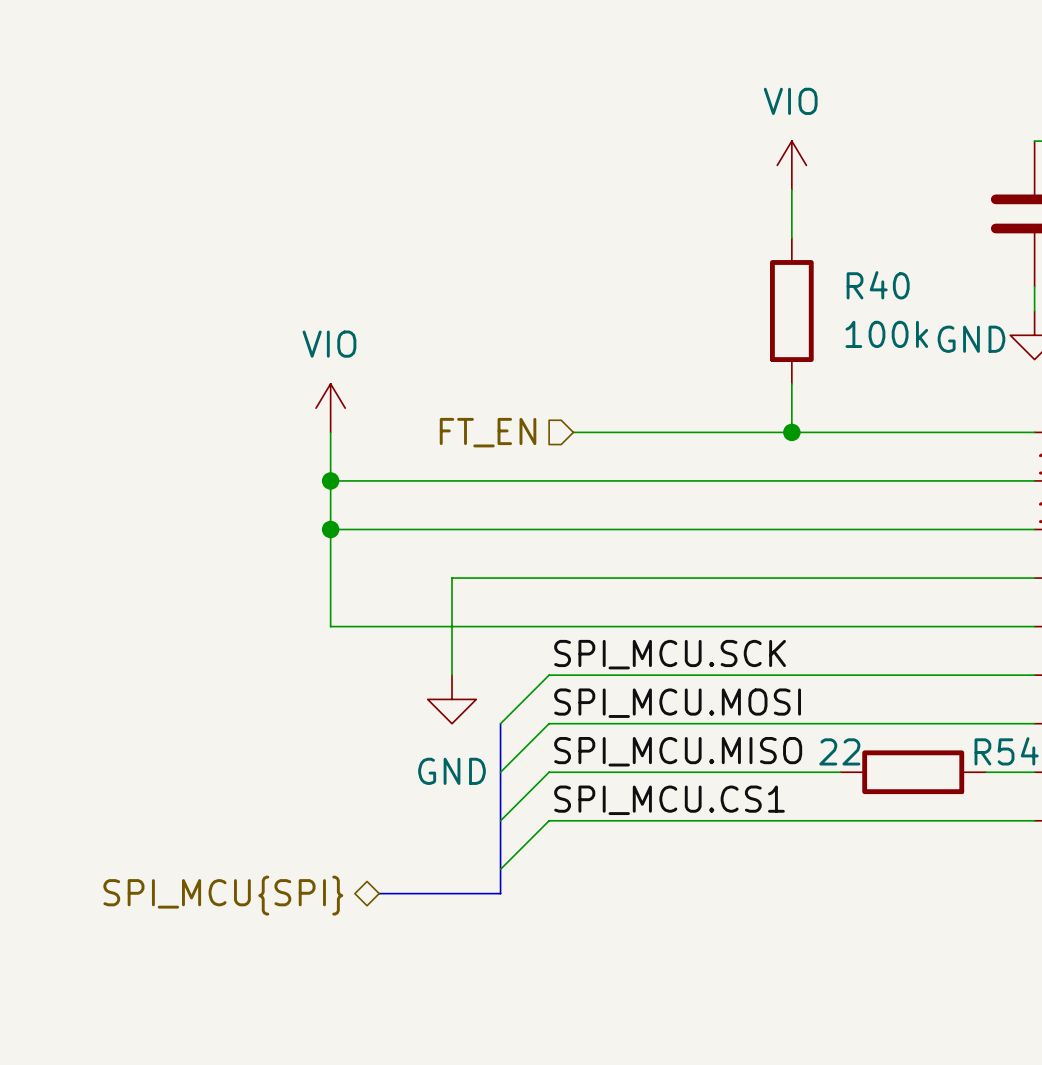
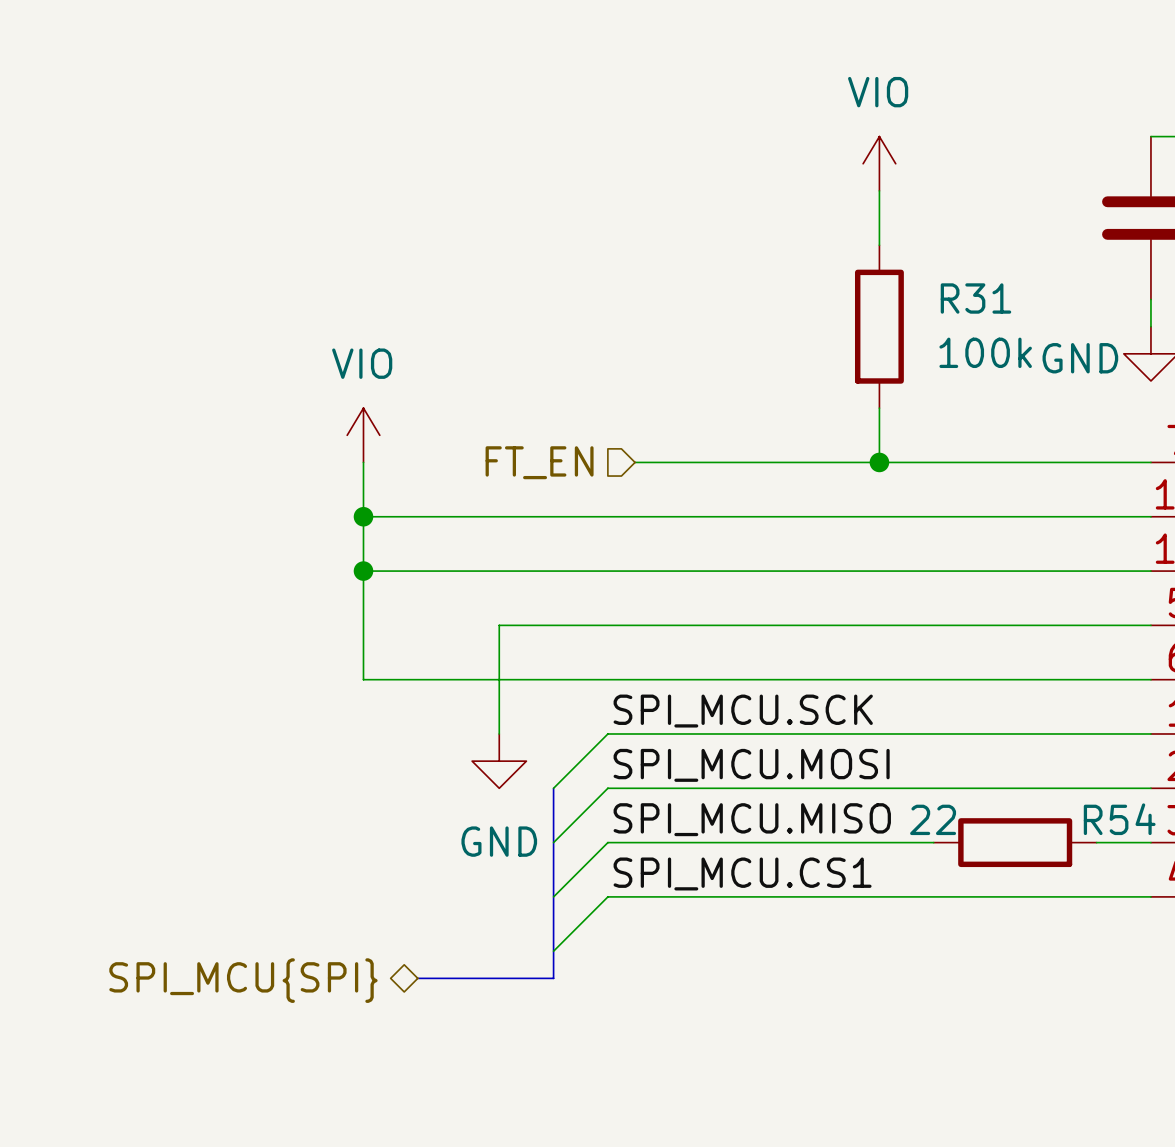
R40 name: R40 (878, 285) -> R31 (975, 298)

